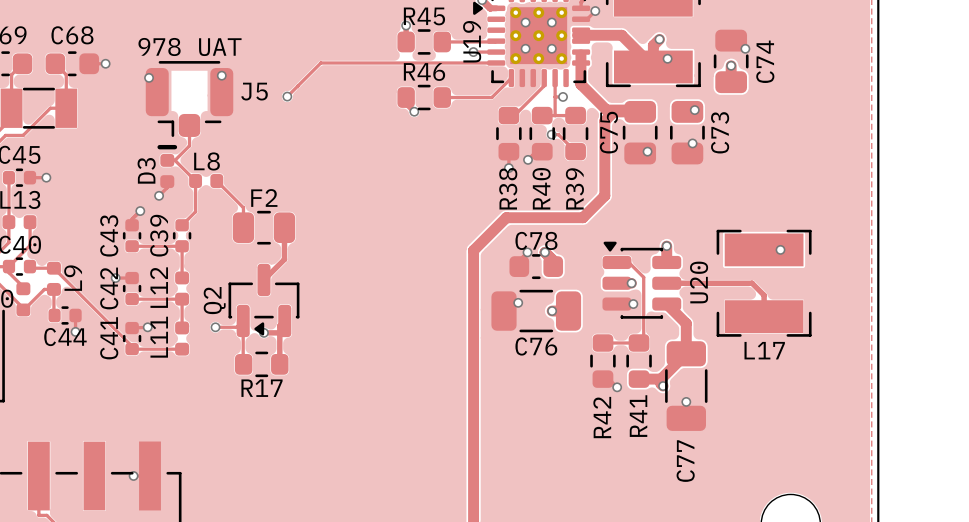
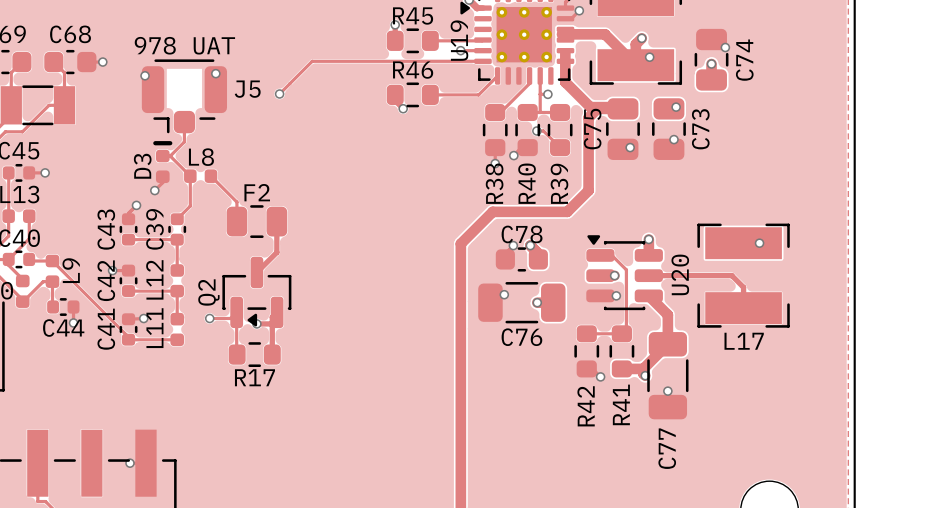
via: (525, 22) -> none
via: (551, 22) -> none
via: (525, 48) -> none
via: (551, 48) -> none

